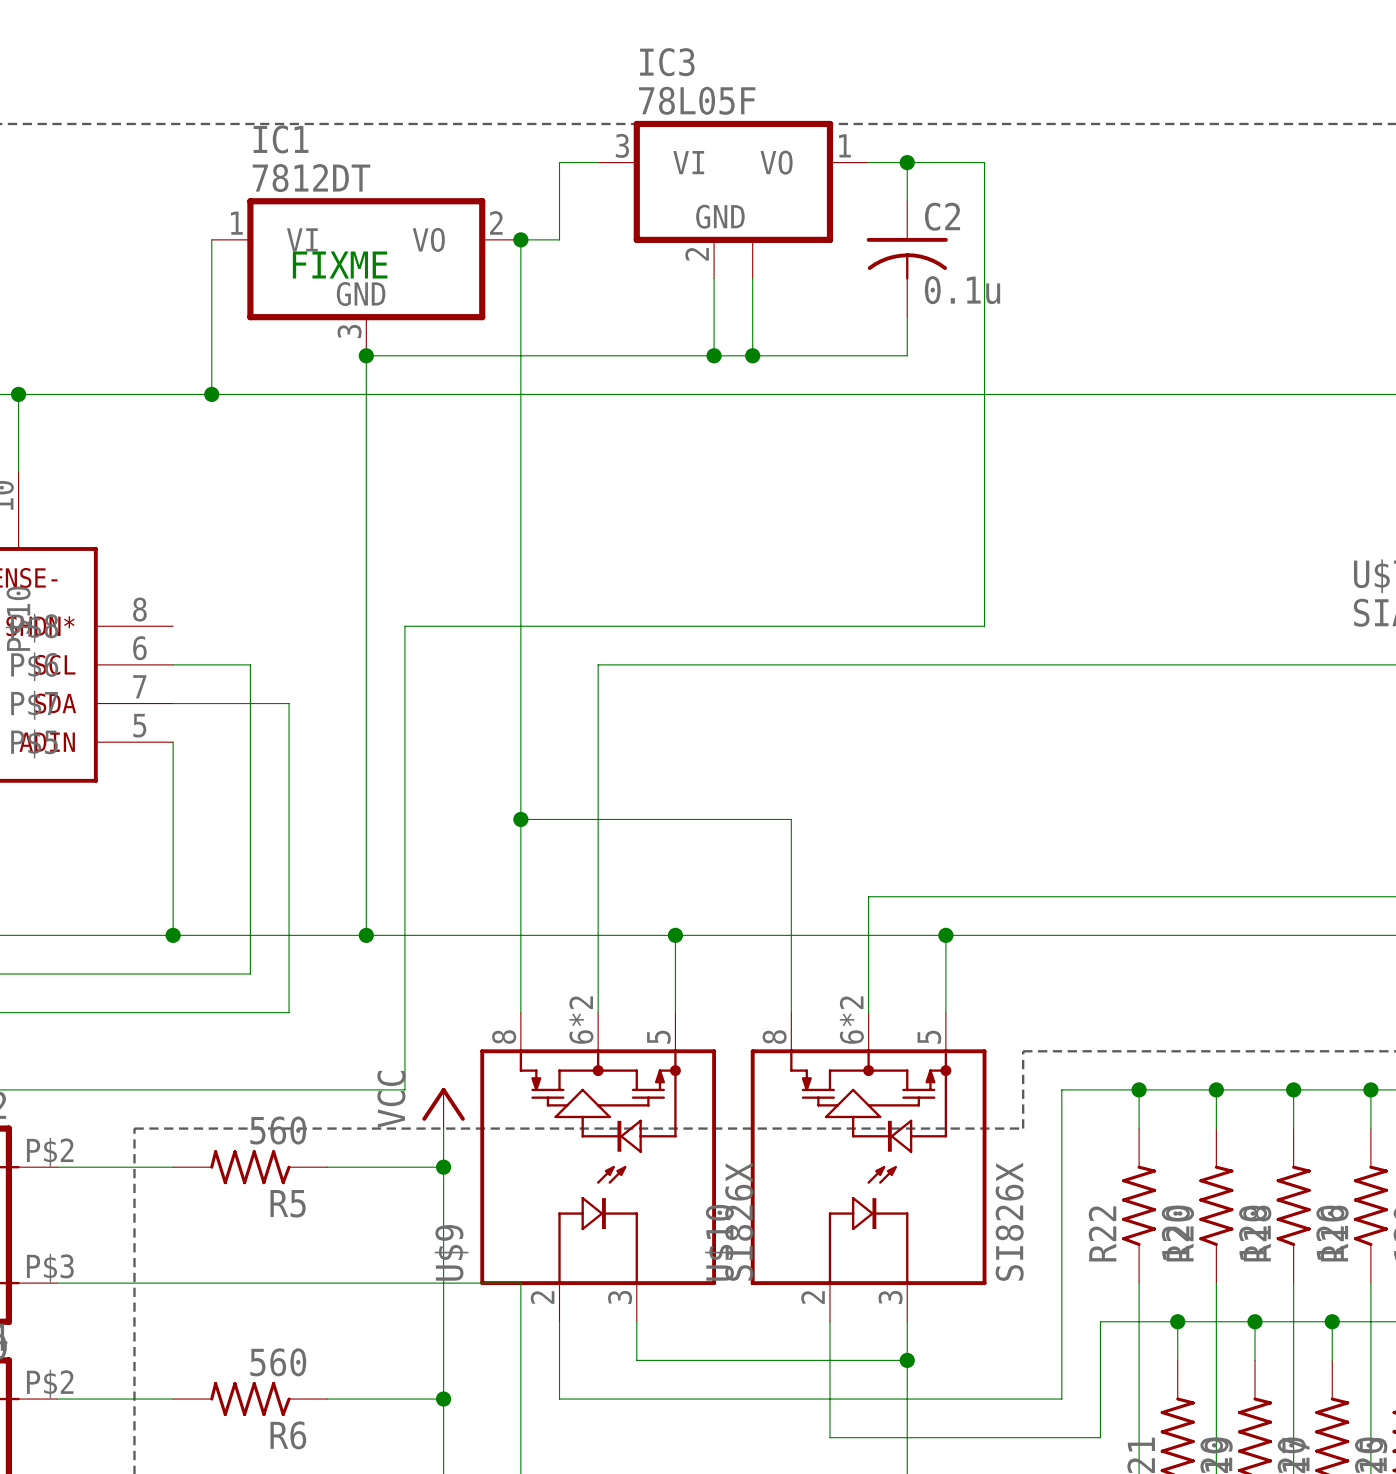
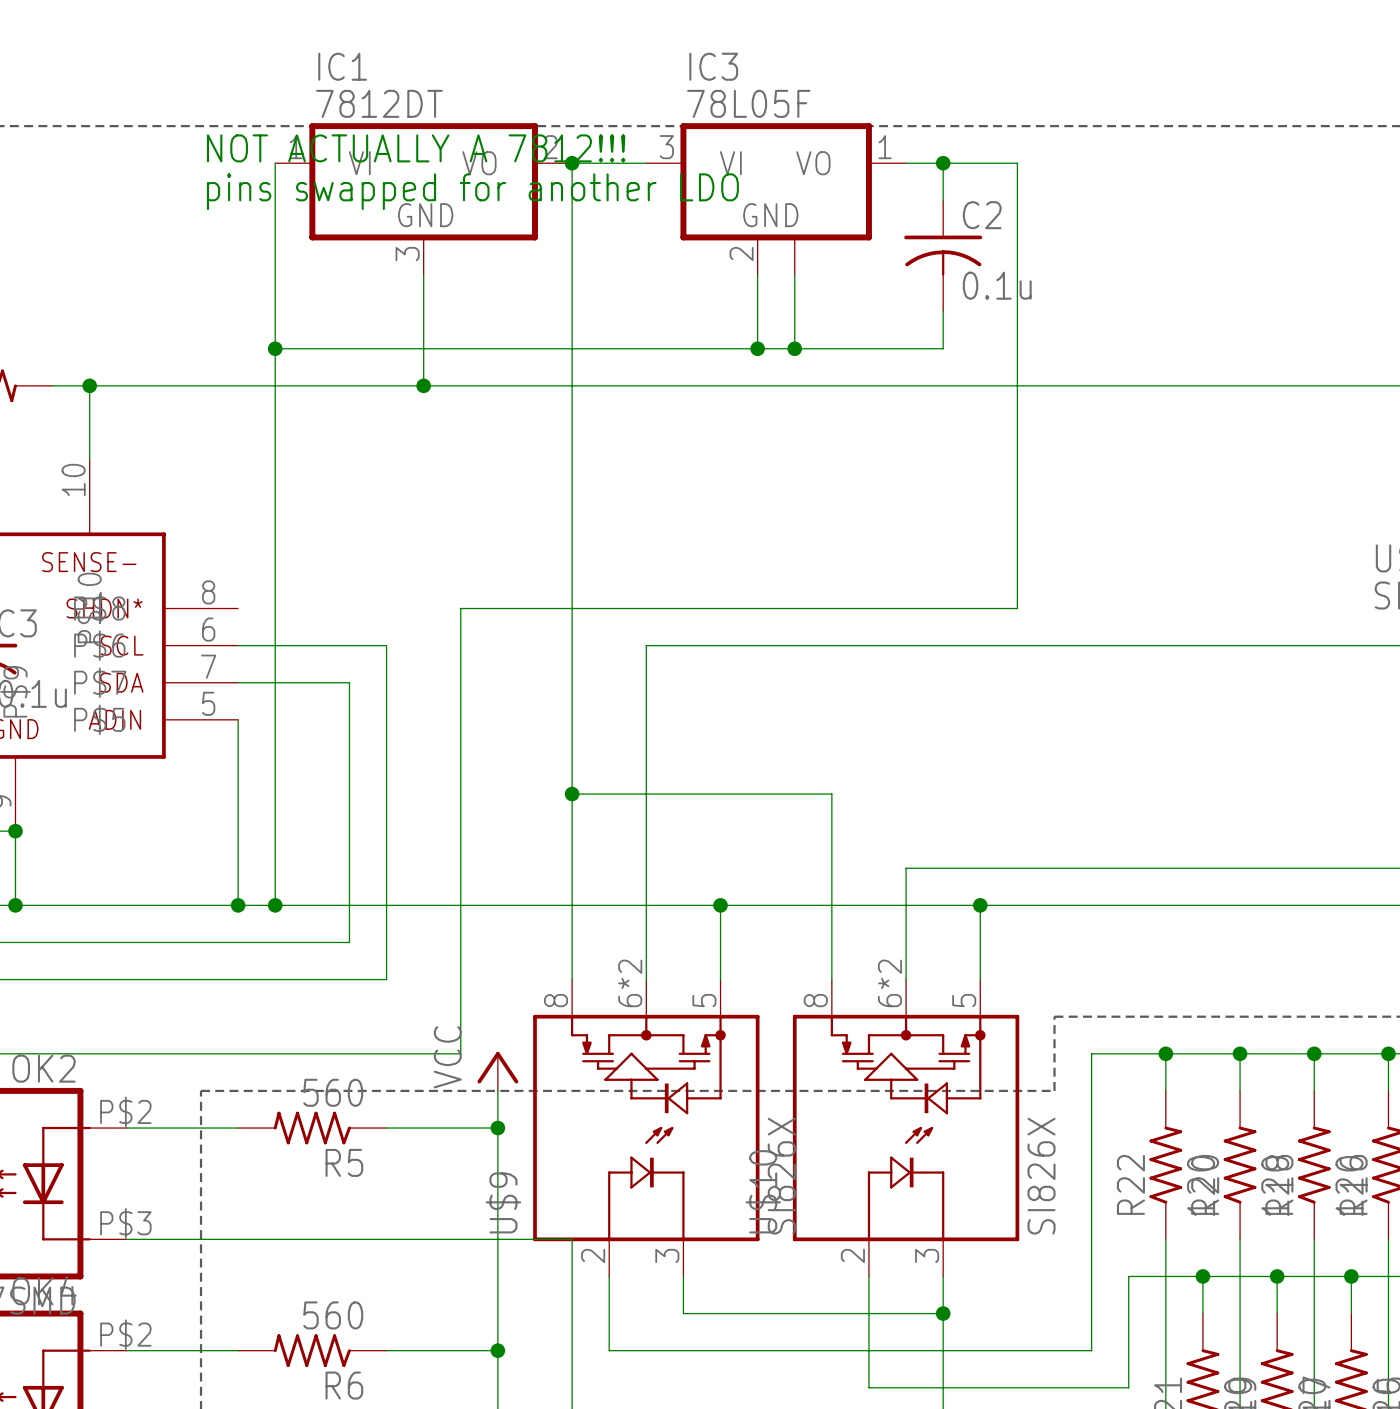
text: none -> NOT ACTUALLY A 7812!!! (416, 148)
wire: none -> (275, 163) (275, 237)
wire: (559, 162) (559, 239) (520, 239) -> (609, 163) (572, 163) (572, 237)
text: none -> pins swapped for another LDO (472, 191)
junction position: (520, 239) -> (572, 163)
text: FIXME (340, 264) -> none
IC1 position: (366, 276) -> (423, 198)
wire: none -> (423, 274) (423, 348) (275, 348)
junction position: (366, 355) -> (423, 385)
junction position: (211, 394) -> (275, 348)
wire: (366, 394) (366, 935) -> (275, 385) (275, 905)
wire: (250, 664) (250, 974) -> (312, 645) (386, 645) (386, 979) (349, 979)
junction: none -> (275, 905)
junction: (366, 935) -> none
wire: (289, 974) (289, 1012) -> (349, 942) (312, 942)

